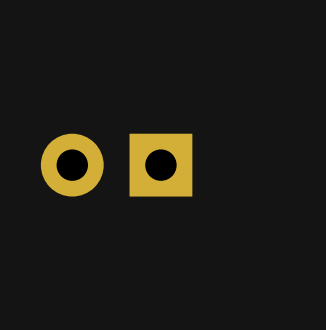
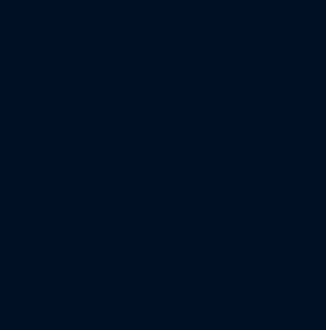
part: (116, 165) -> none

